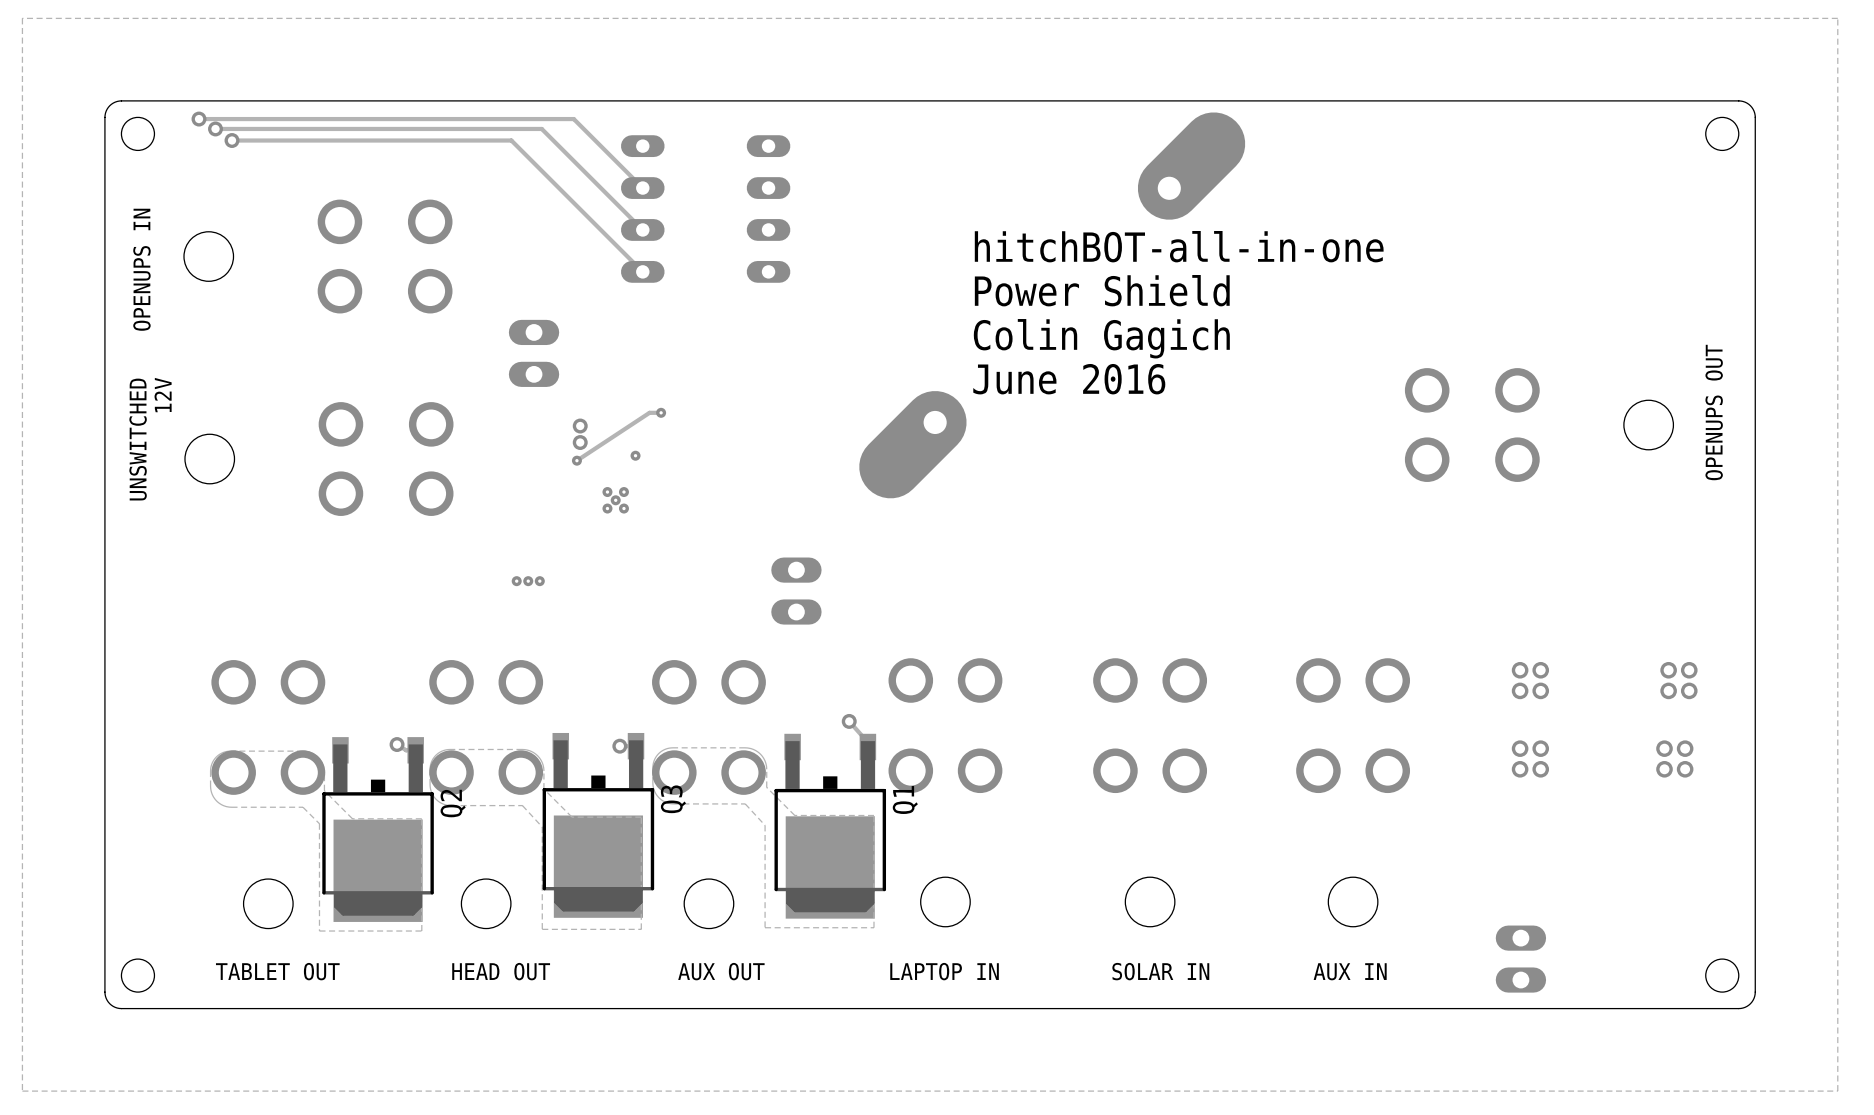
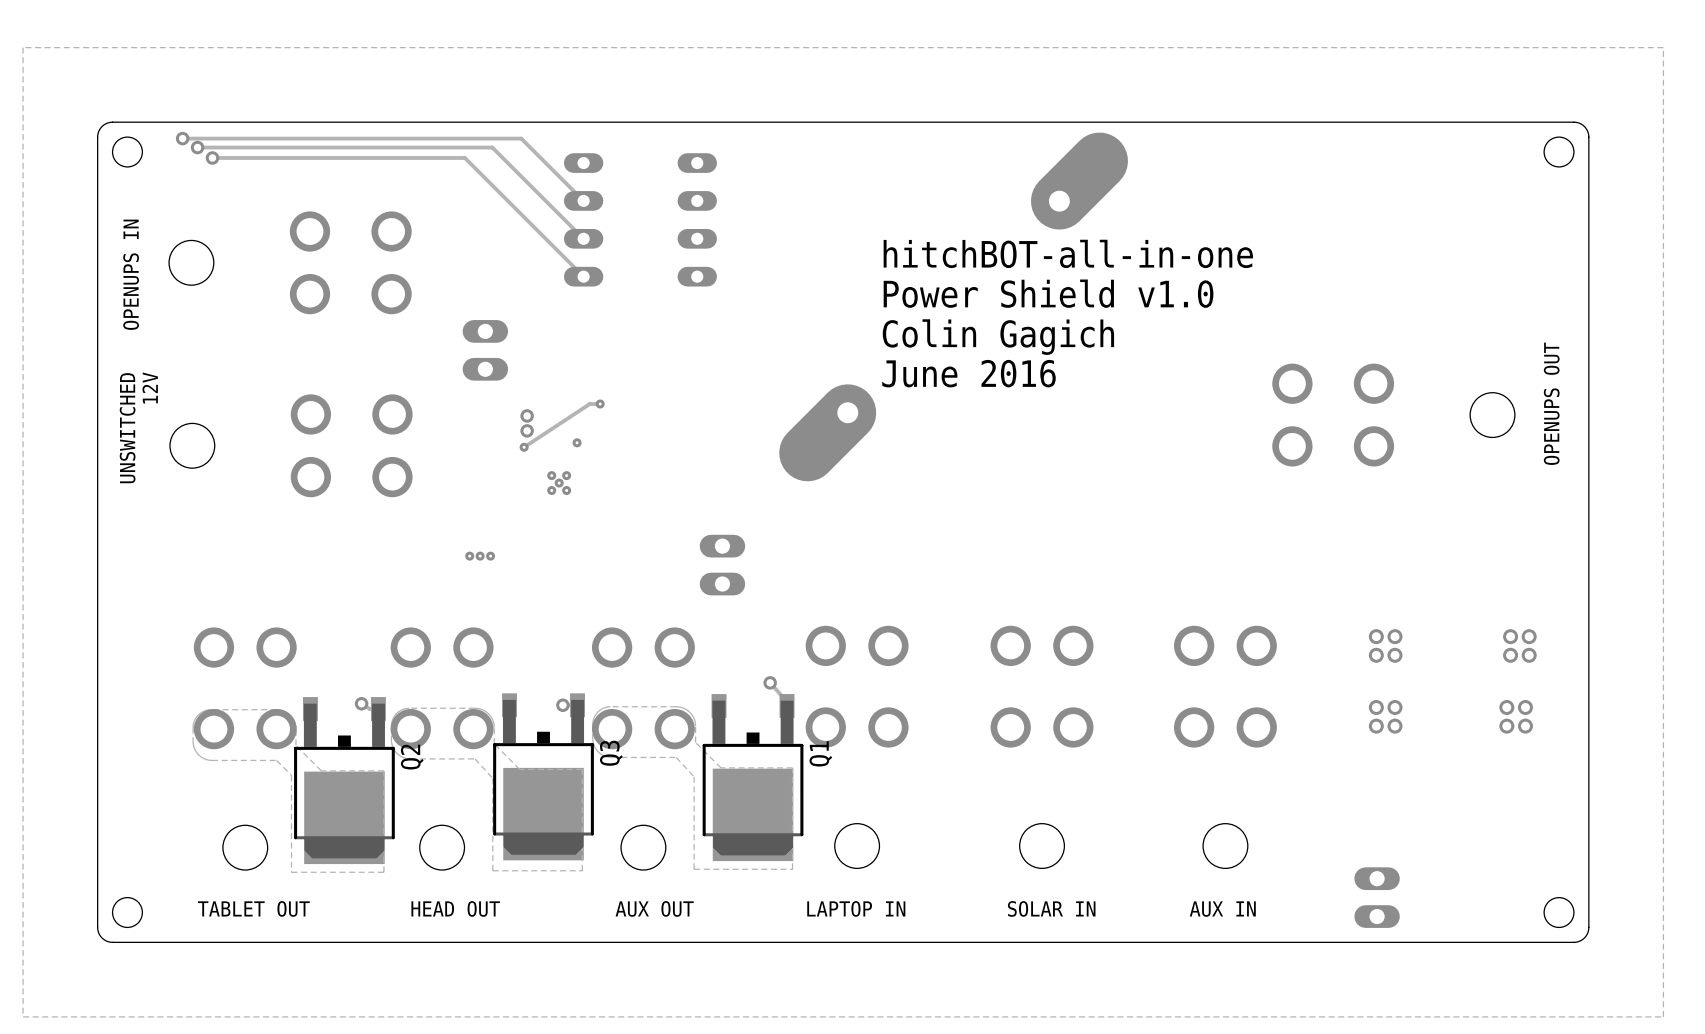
text: Power Shield (1102, 290) -> Power Shield v1.0 (1048, 293)

